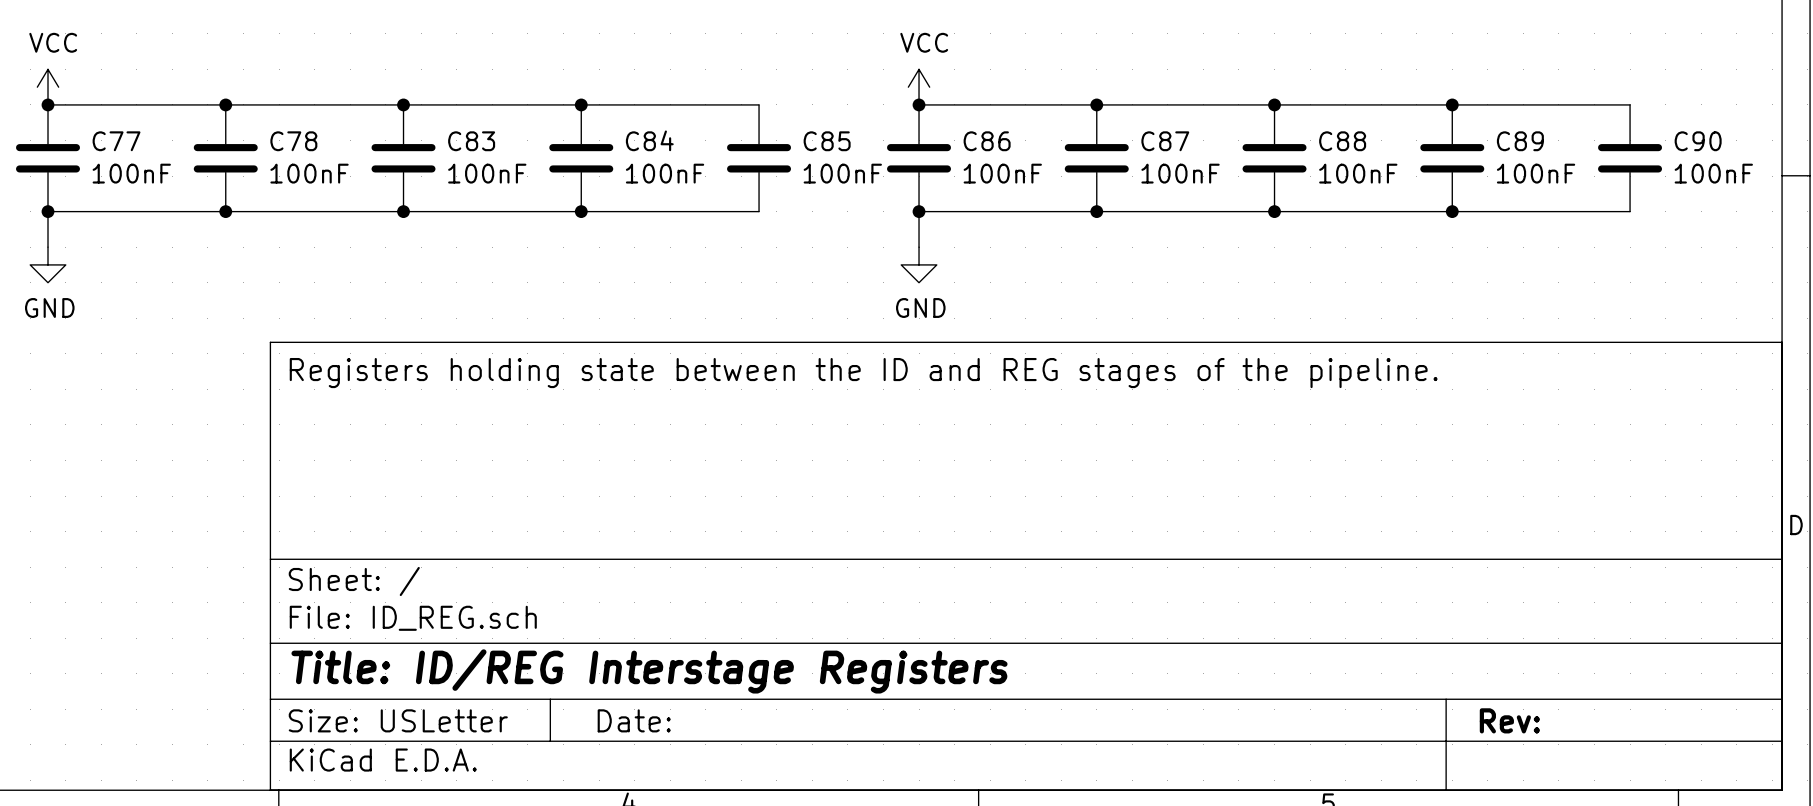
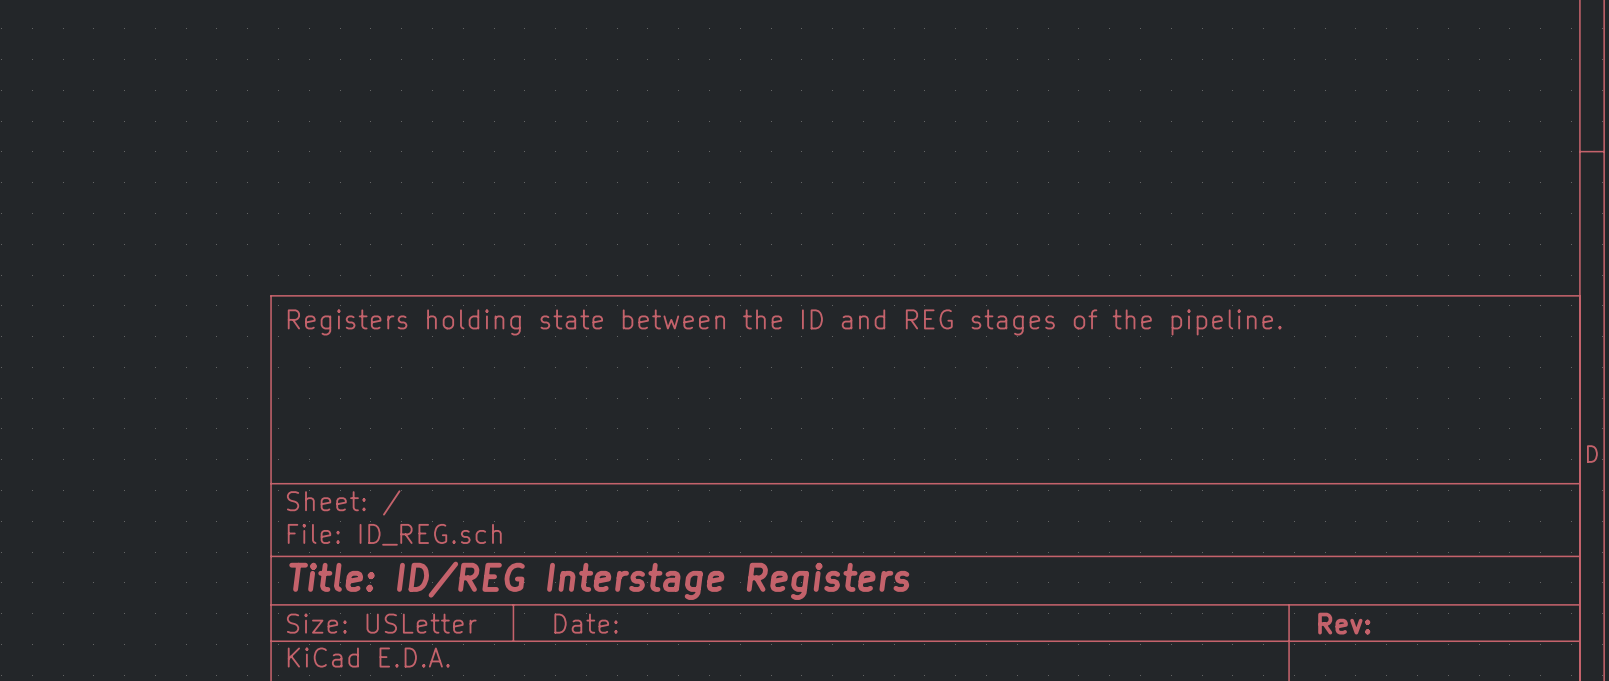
power symbol: VCC (48, 87) -> none
power symbol: VCC (919, 87) -> none
wire: (48, 104) (759, 104) -> none
junction: (48, 104) -> none
junction: (225, 104) -> none
junction: (403, 104) -> none
junction: (581, 104) -> none
wire: (919, 104) (1630, 104) -> none
junction: (919, 104) -> none
junction: (1096, 104) -> none
junction: (1274, 104) -> none
junction: (1452, 104) -> none
C77: 100nF (48, 158) -> none
C78: 100nF (225, 158) -> none
C83: 100nF (403, 158) -> none
C84: 100nF (581, 158) -> none
C85: 100nF (759, 158) -> none
C86: 100nF (919, 158) -> none
C87: 100nF (1096, 158) -> none
C88: 100nF (1274, 158) -> none
C89: 100nF (1452, 158) -> none
C90: 100nF (1630, 158) -> none
junction: (48, 211) -> none
junction: (225, 211) -> none
junction: (403, 211) -> none
junction: (581, 211) -> none
wire: (759, 211) (48, 211) (48, 247) -> none
junction: (919, 211) -> none
junction: (1096, 211) -> none
junction: (1274, 211) -> none
junction: (1452, 211) -> none
wire: (1630, 211) (919, 211) (919, 247) -> none
power symbol: GND (48, 264) -> none
power symbol: GND (919, 264) -> none

